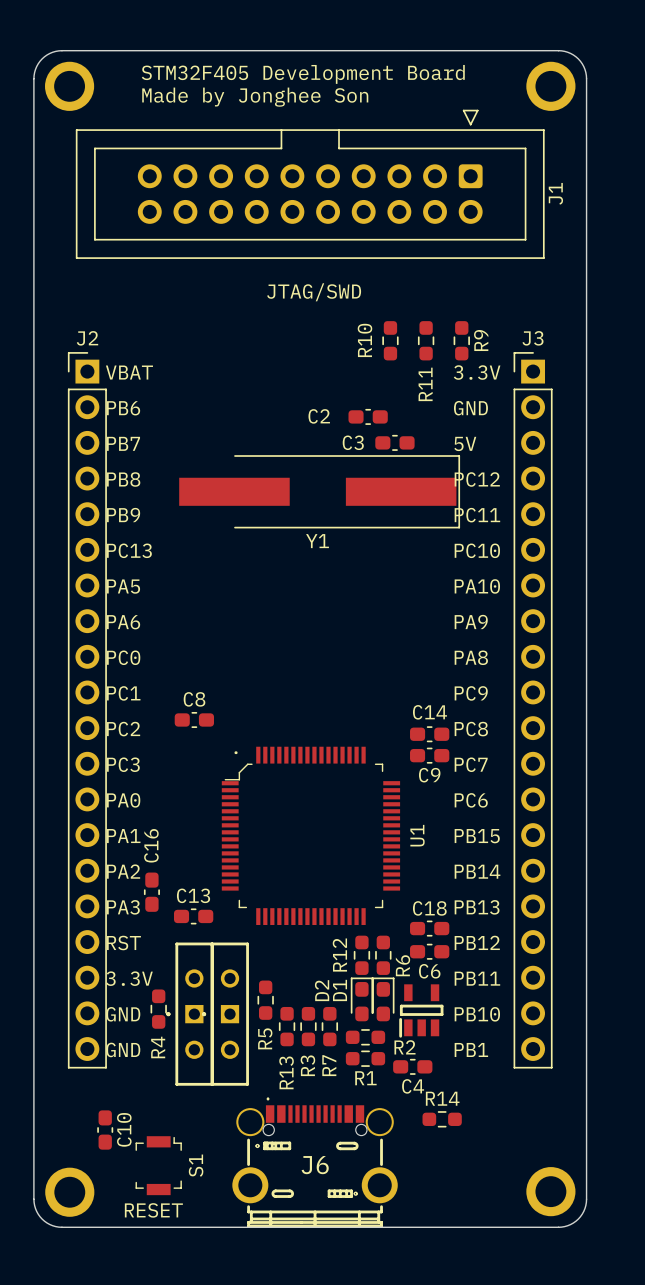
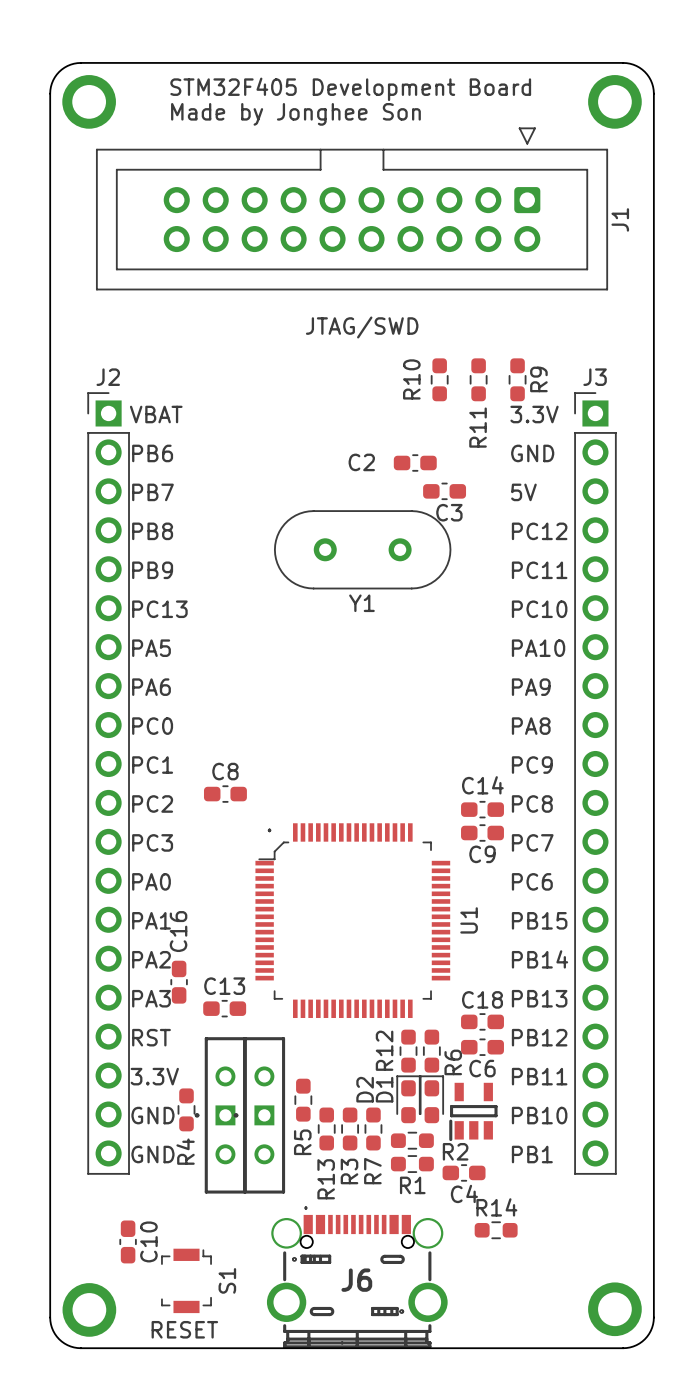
C3 name position: C3 (353, 442) -> C3 (449, 512)
Y1 footprint: [179, 455, 461, 529] -> [273, 510, 452, 590]

